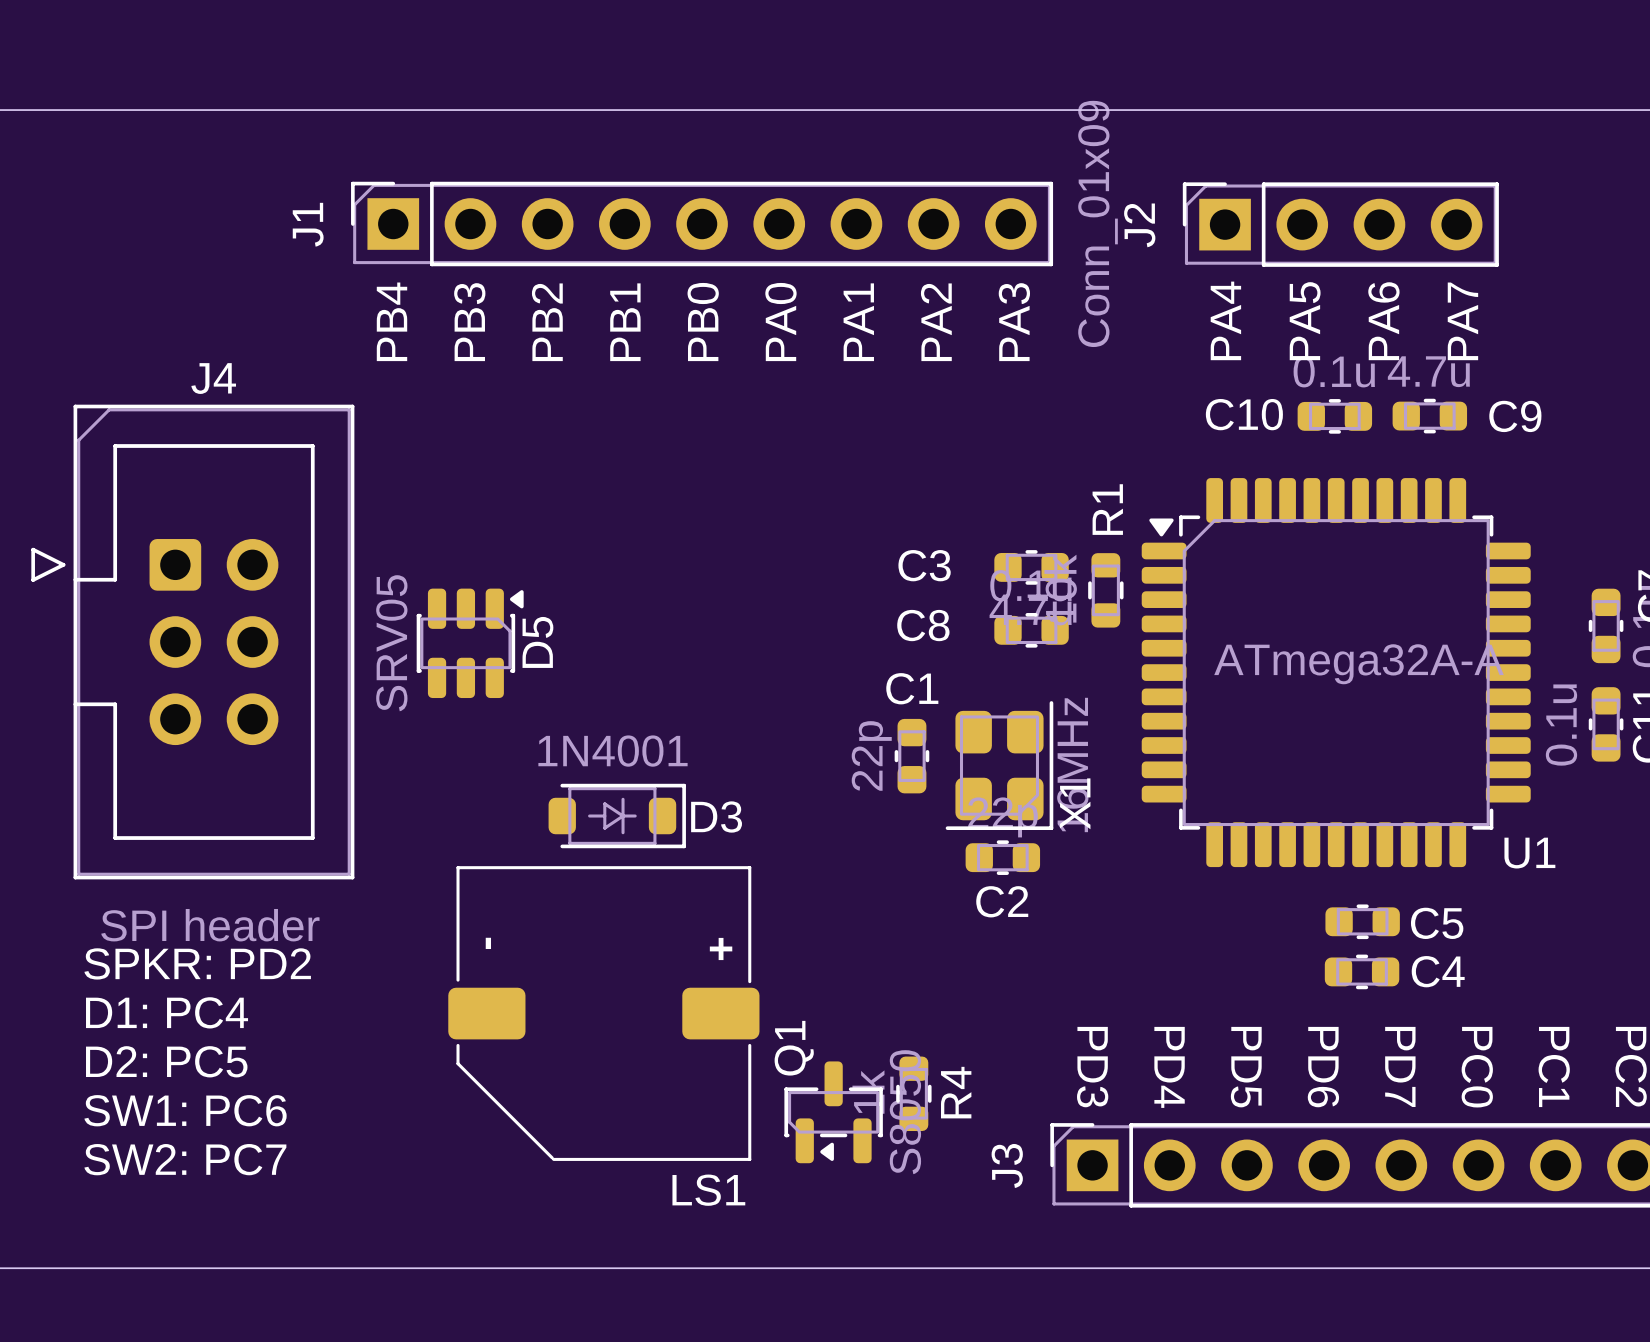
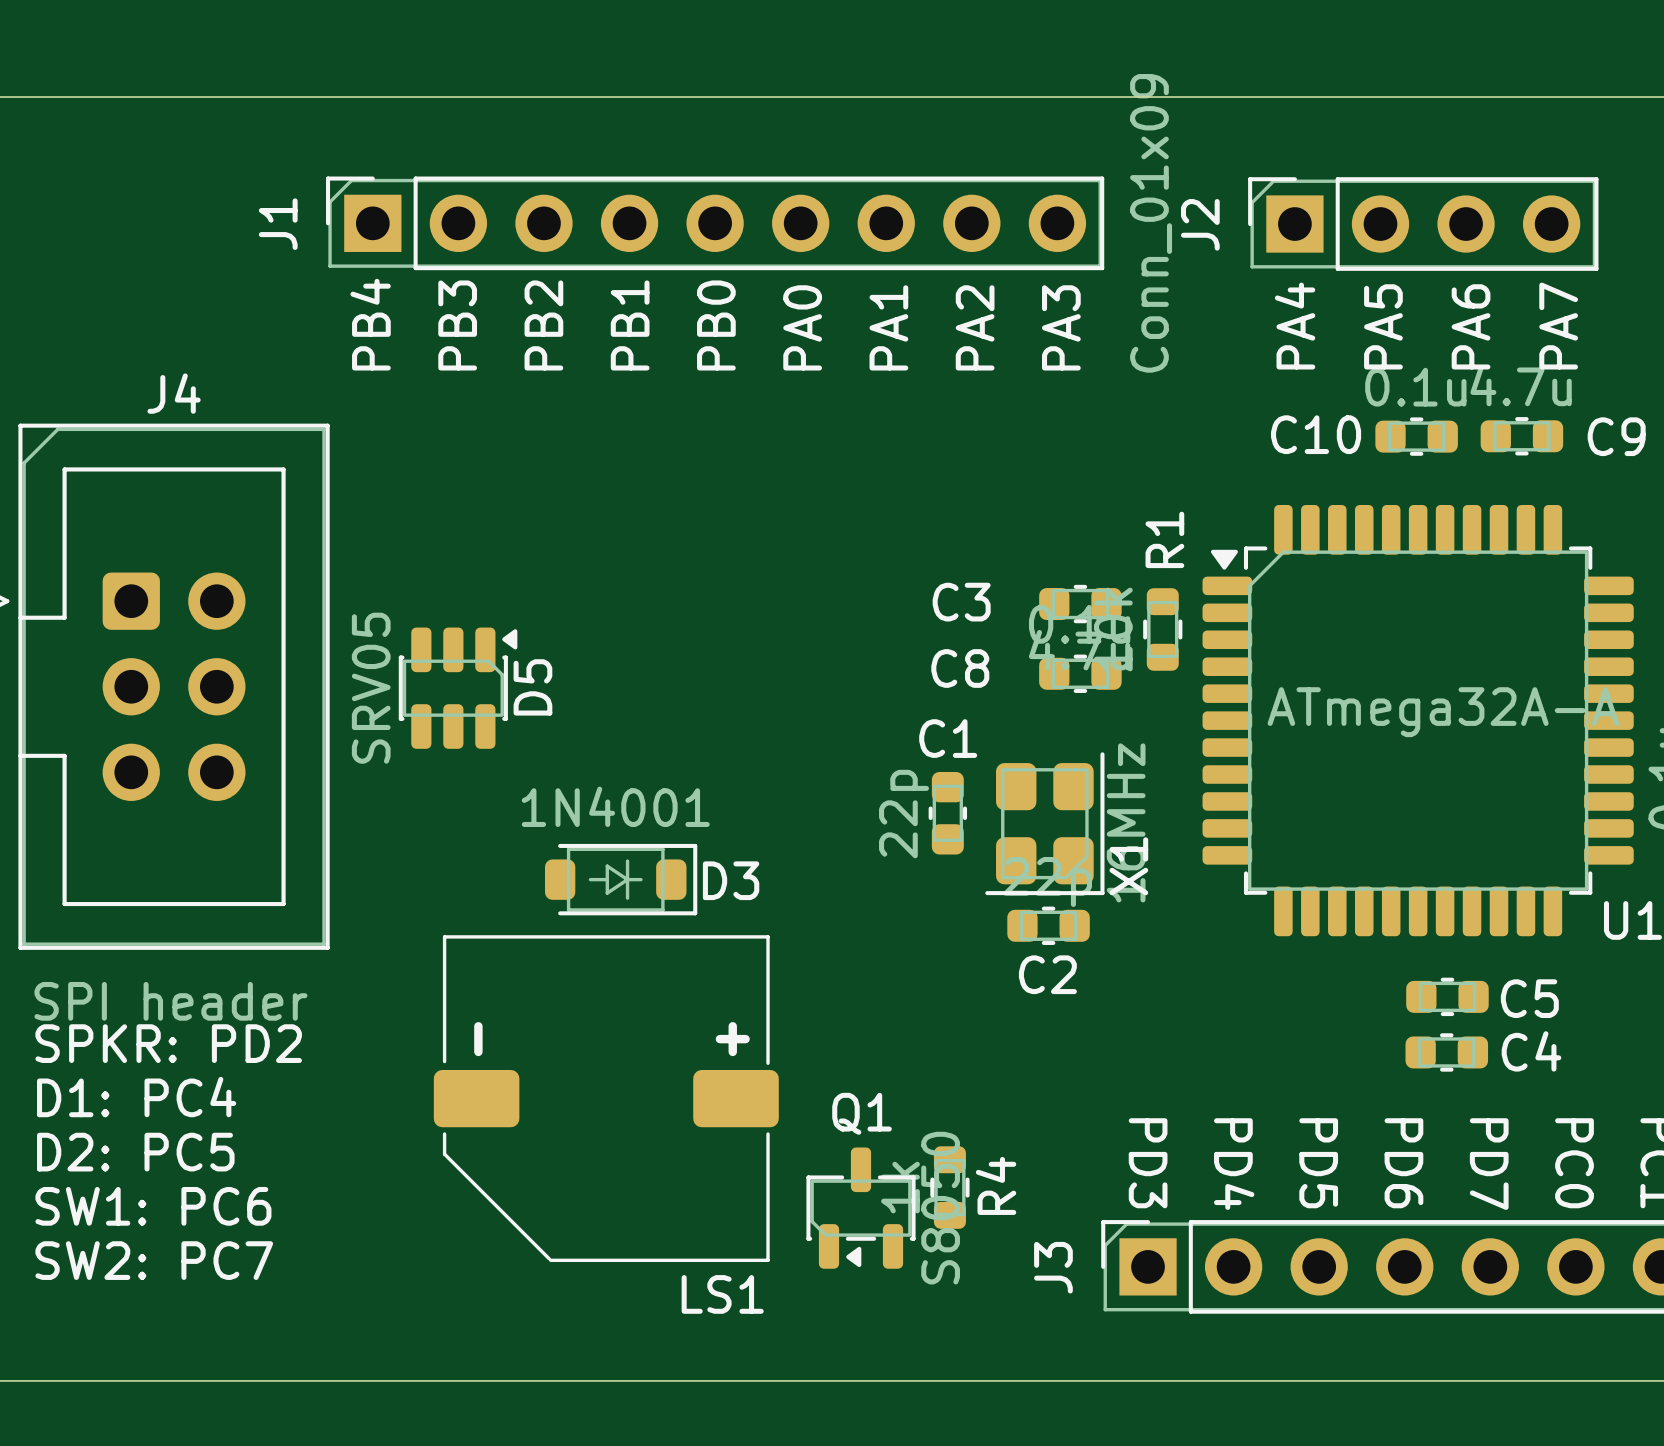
Q1 name rotation: 0° (794, 1048) -> 90° clockwise (862, 1113)
Q1 footprint: [784, 1061, 883, 1164] -> [806, 1147, 916, 1269]

